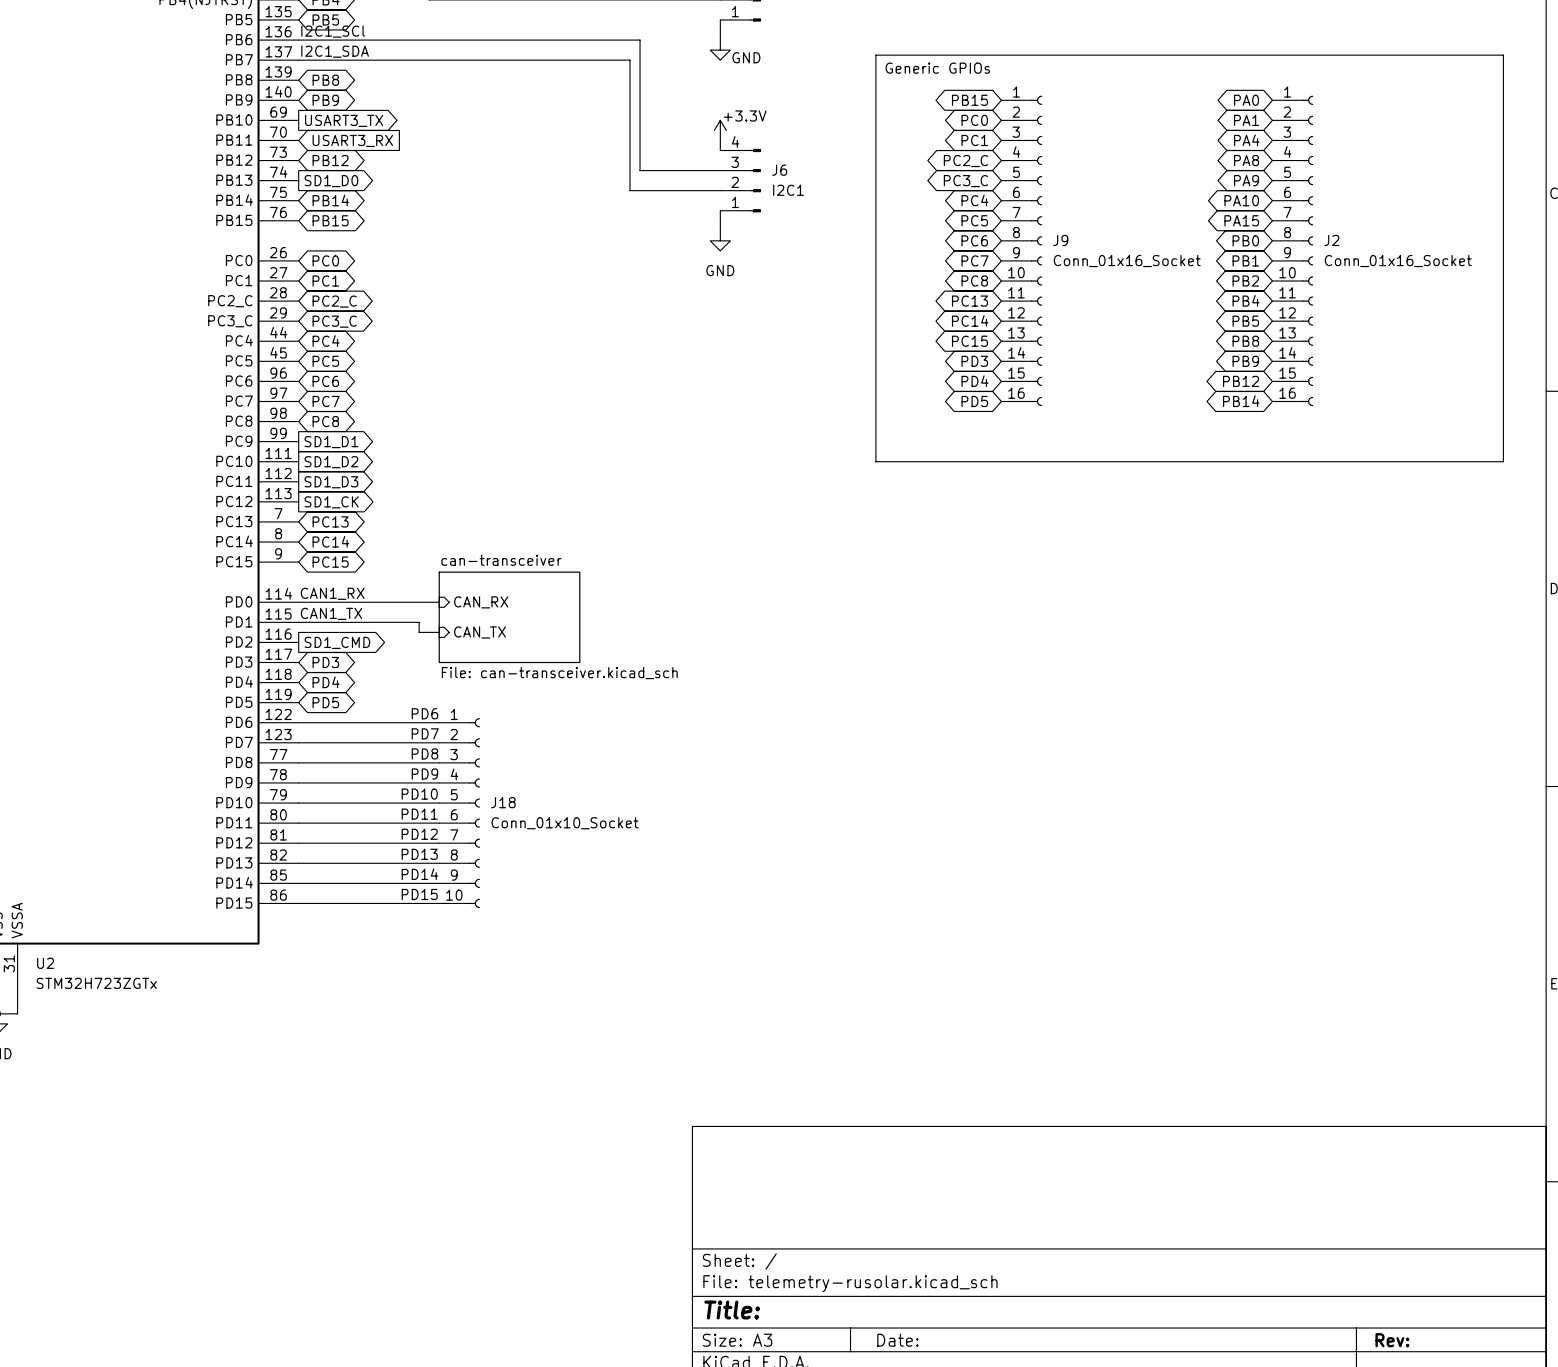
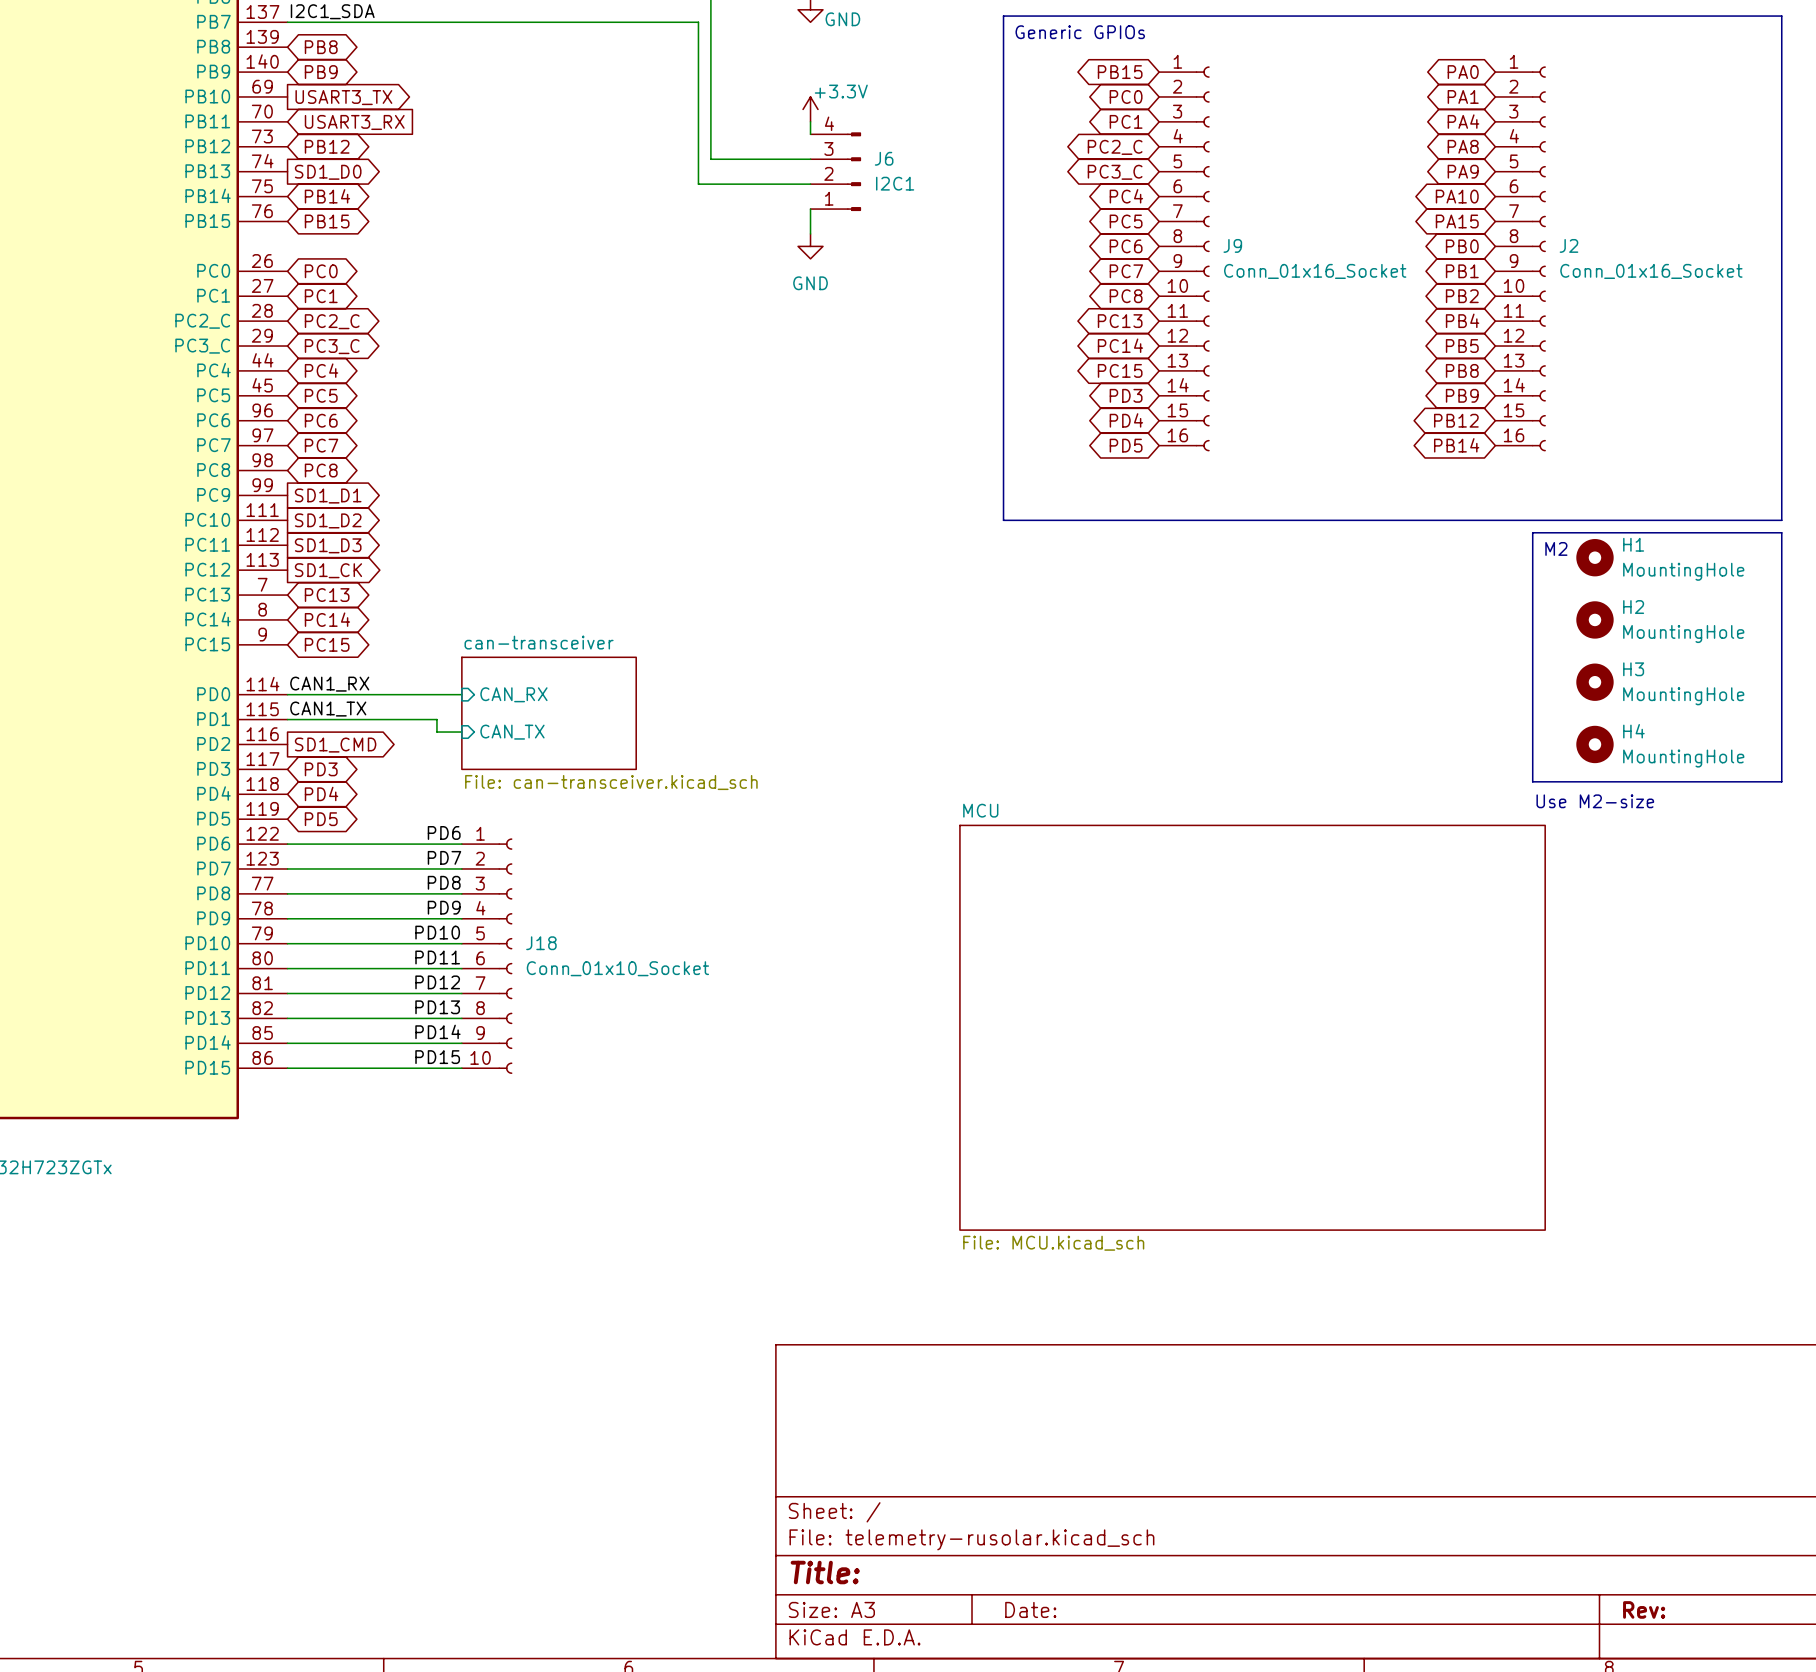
line: none -> (1532, 532) (1781, 532) (1781, 781) (1532, 781) (1532, 532)
text: none -> M2 (1556, 548)
H1: none -> MountingHole (1594, 557)
H2: none -> MountingHole (1594, 619)
H3: none -> MountingHole (1594, 682)
H4: none -> MountingHole (1594, 744)
text: none -> Use M2-size (1595, 801)
sheet MCU: none -> File: MCU.kicad_sch (1252, 1027)

